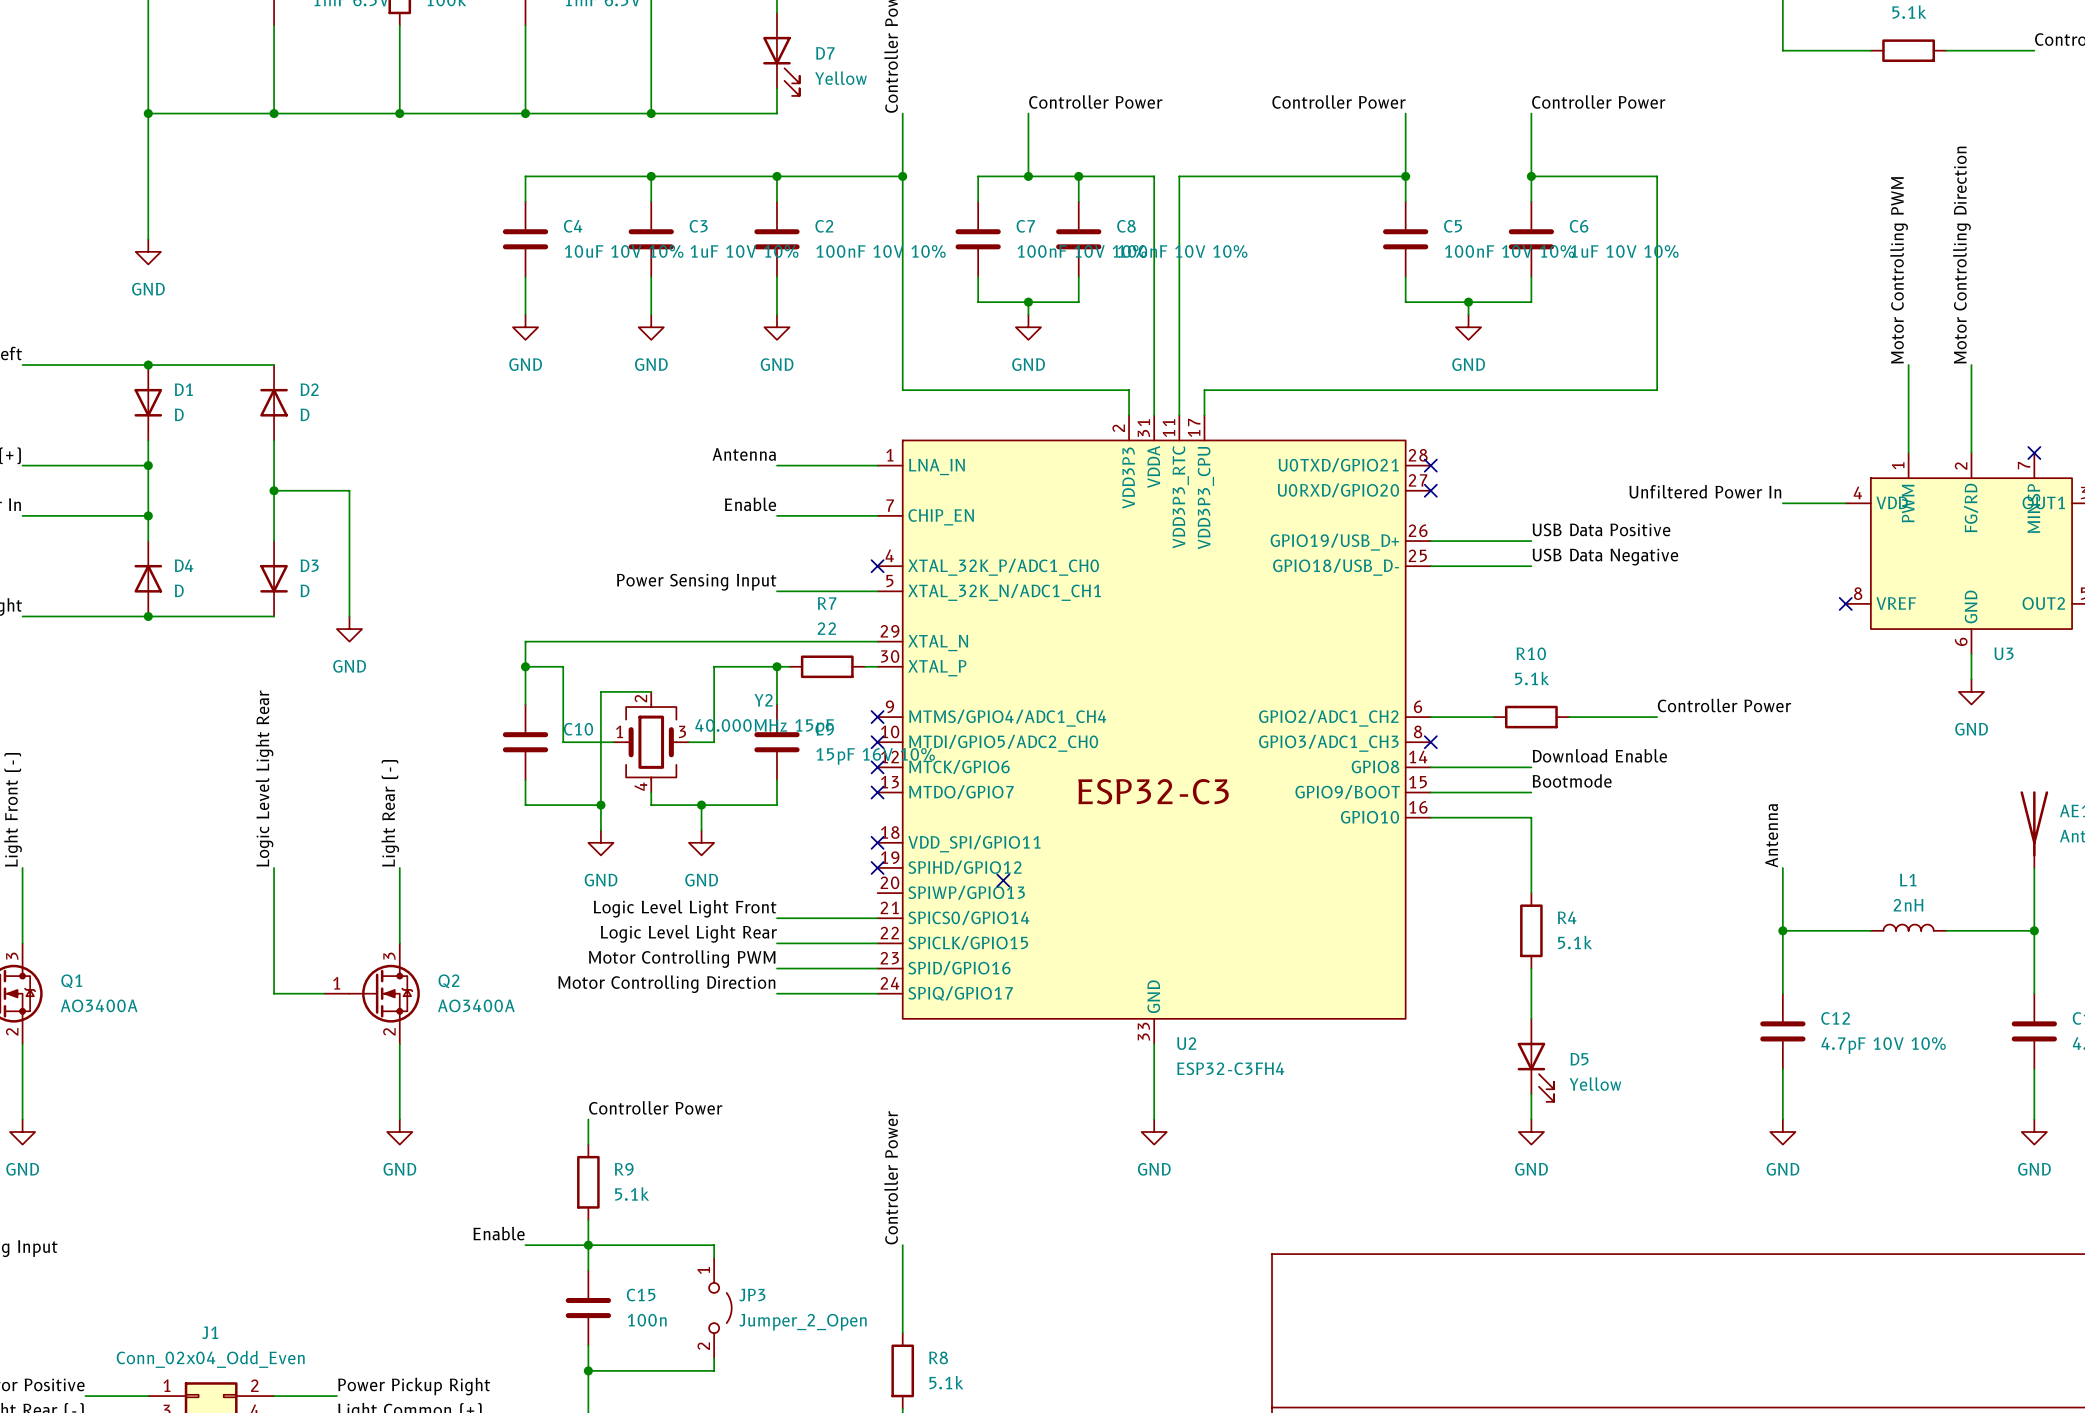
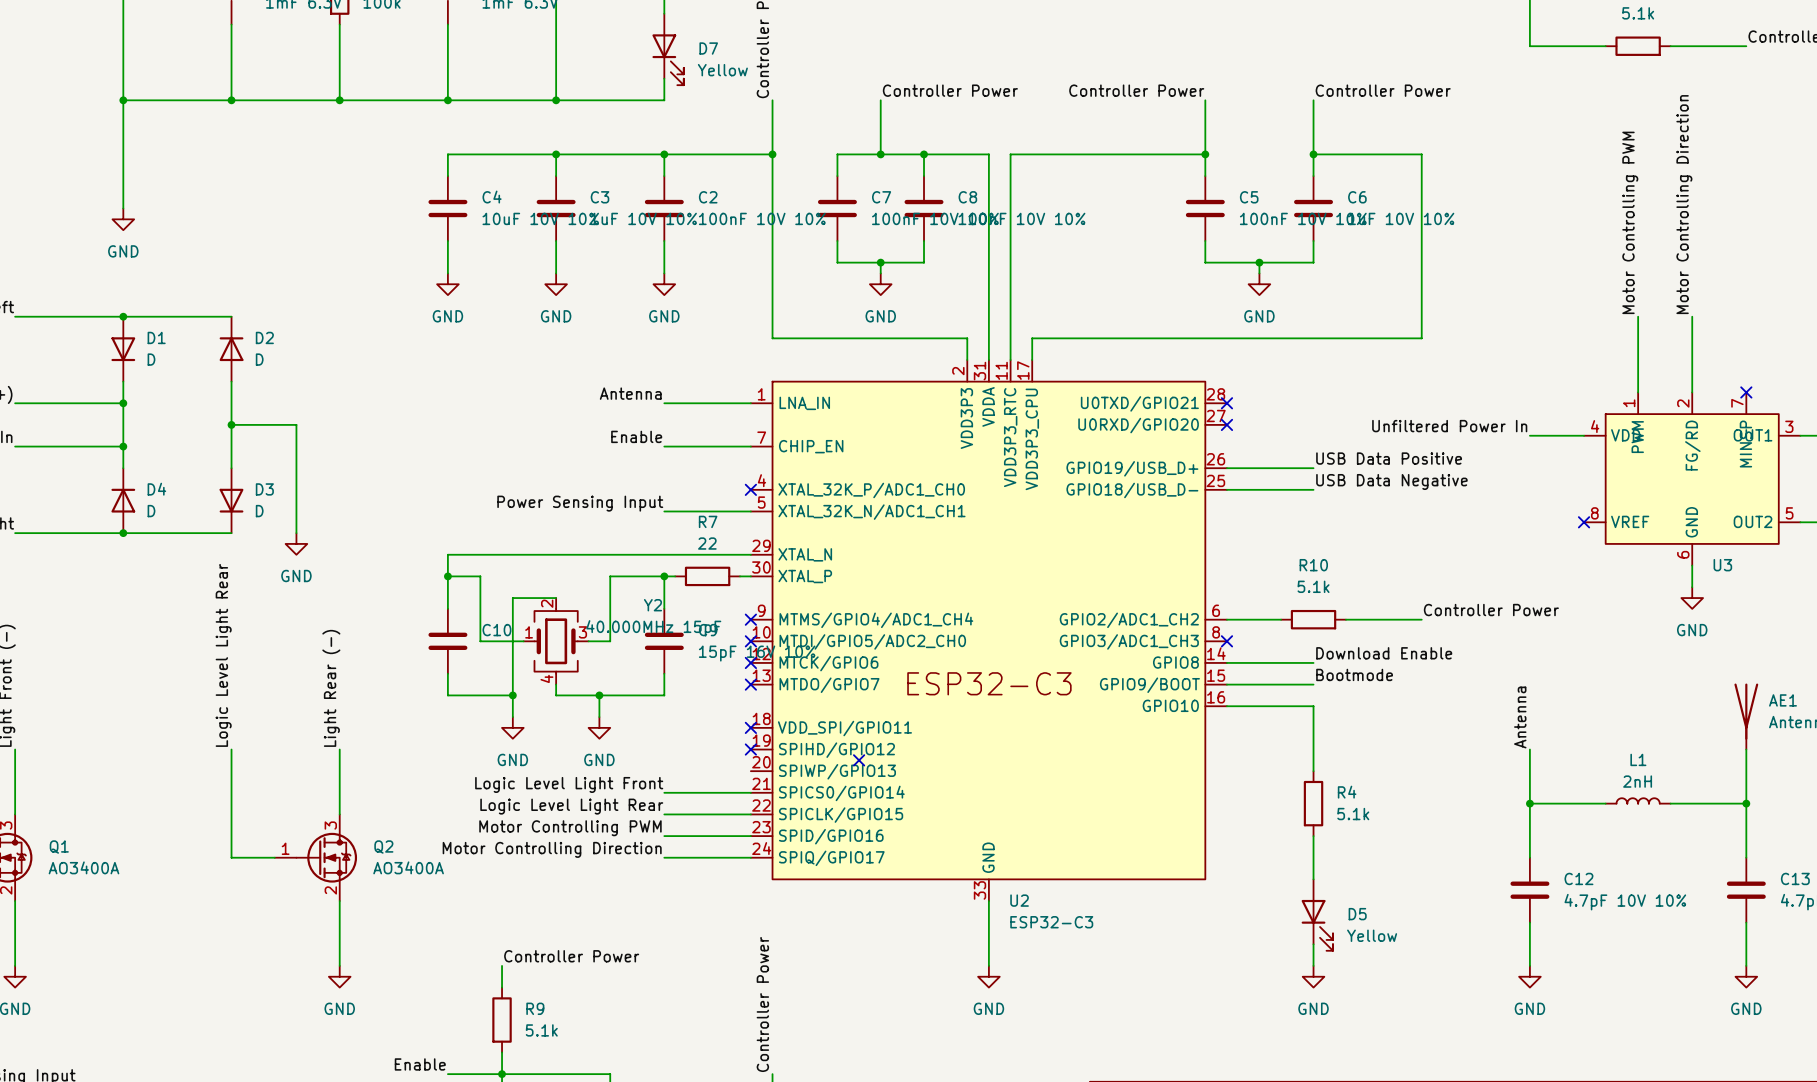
U2 value: ESP32-C3FH4 (1230, 1068) -> ESP32-C3 (1051, 922)

